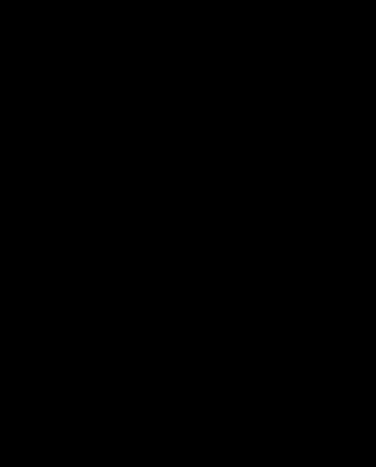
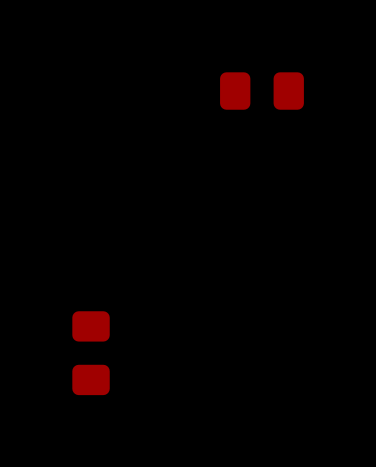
part: none -> (261, 91)
part: none -> (91, 353)

